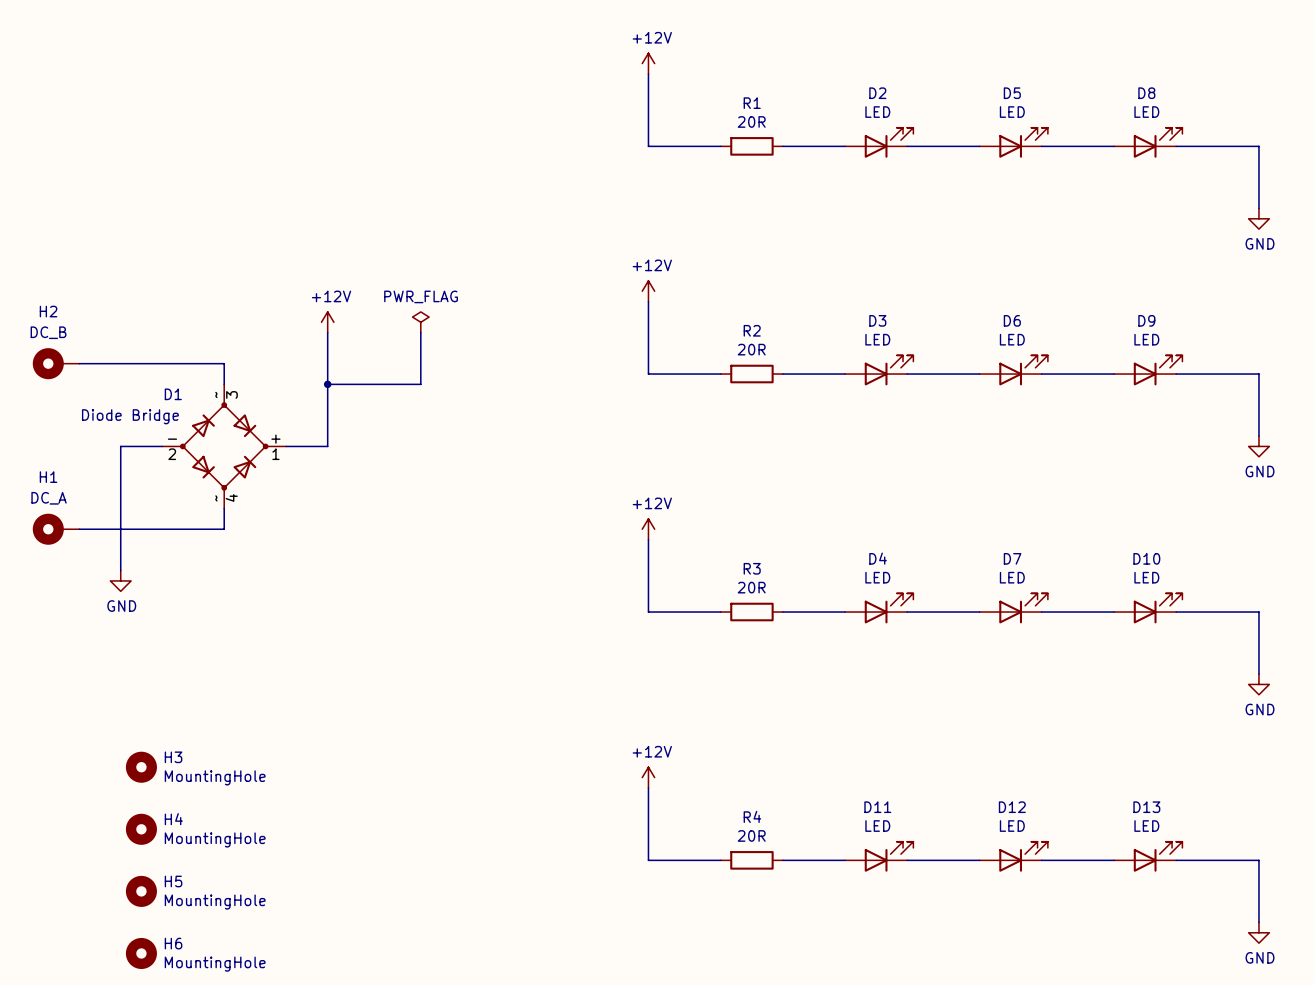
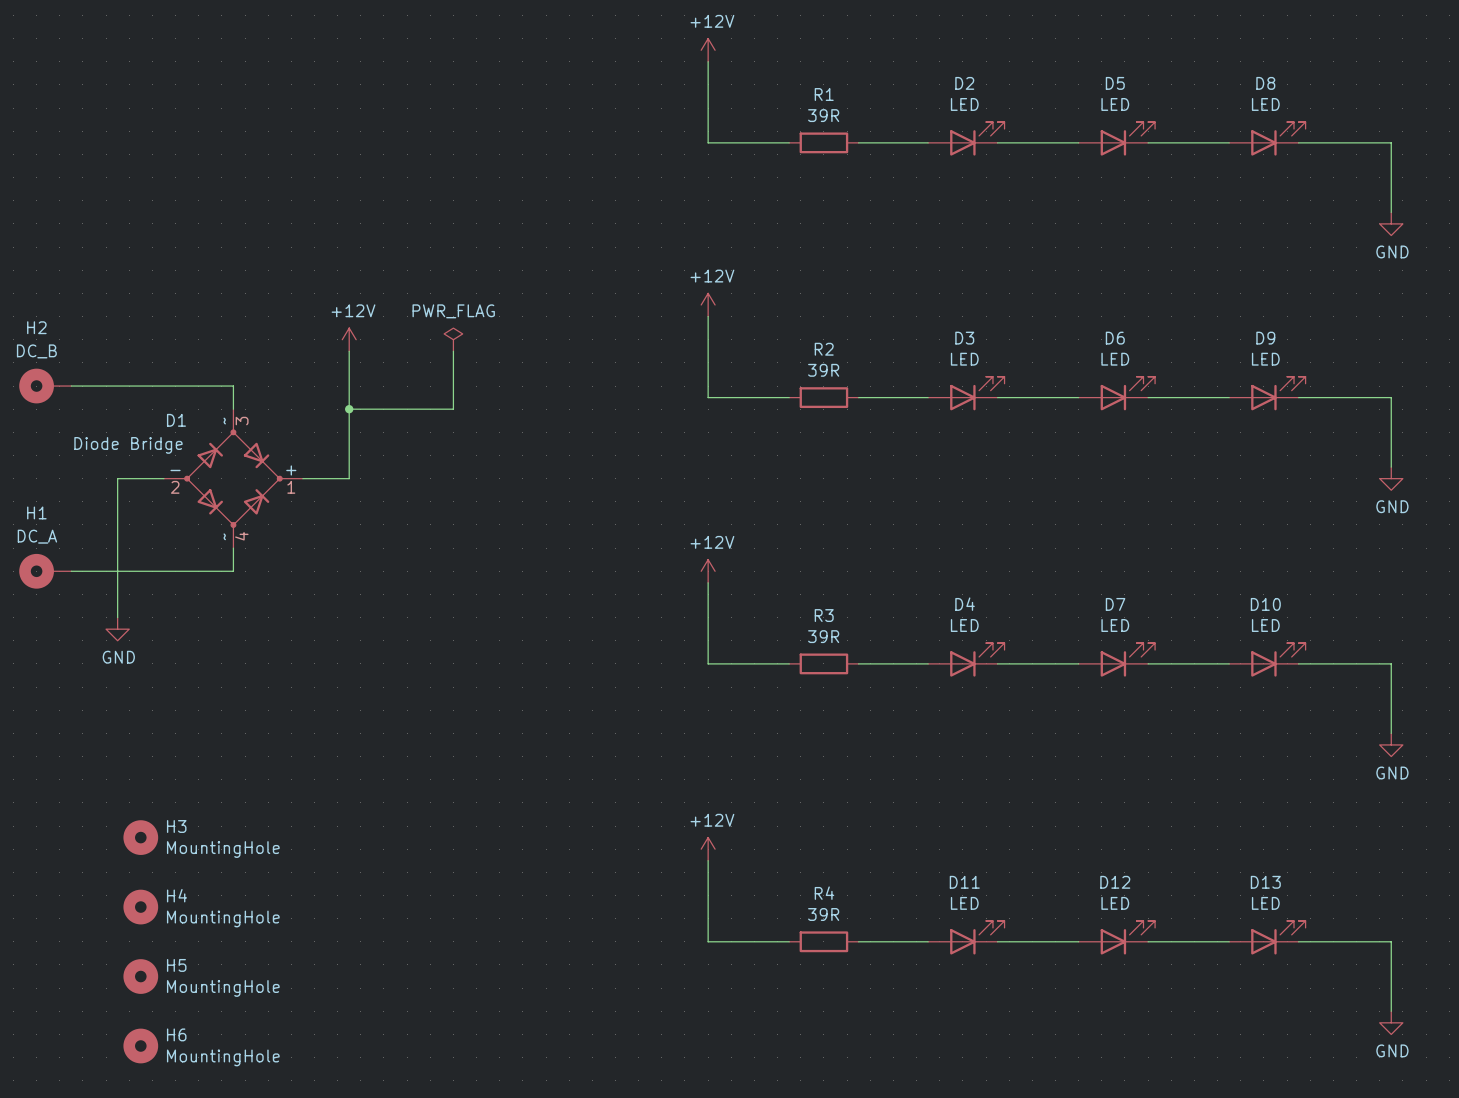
R1 value: 20R (751, 121) -> 39R (823, 115)
R2 value: 20R (751, 349) -> 39R (823, 370)
R3 value: 20R (751, 587) -> 39R (823, 636)
R4 value: 20R (751, 835) -> 39R (823, 914)

